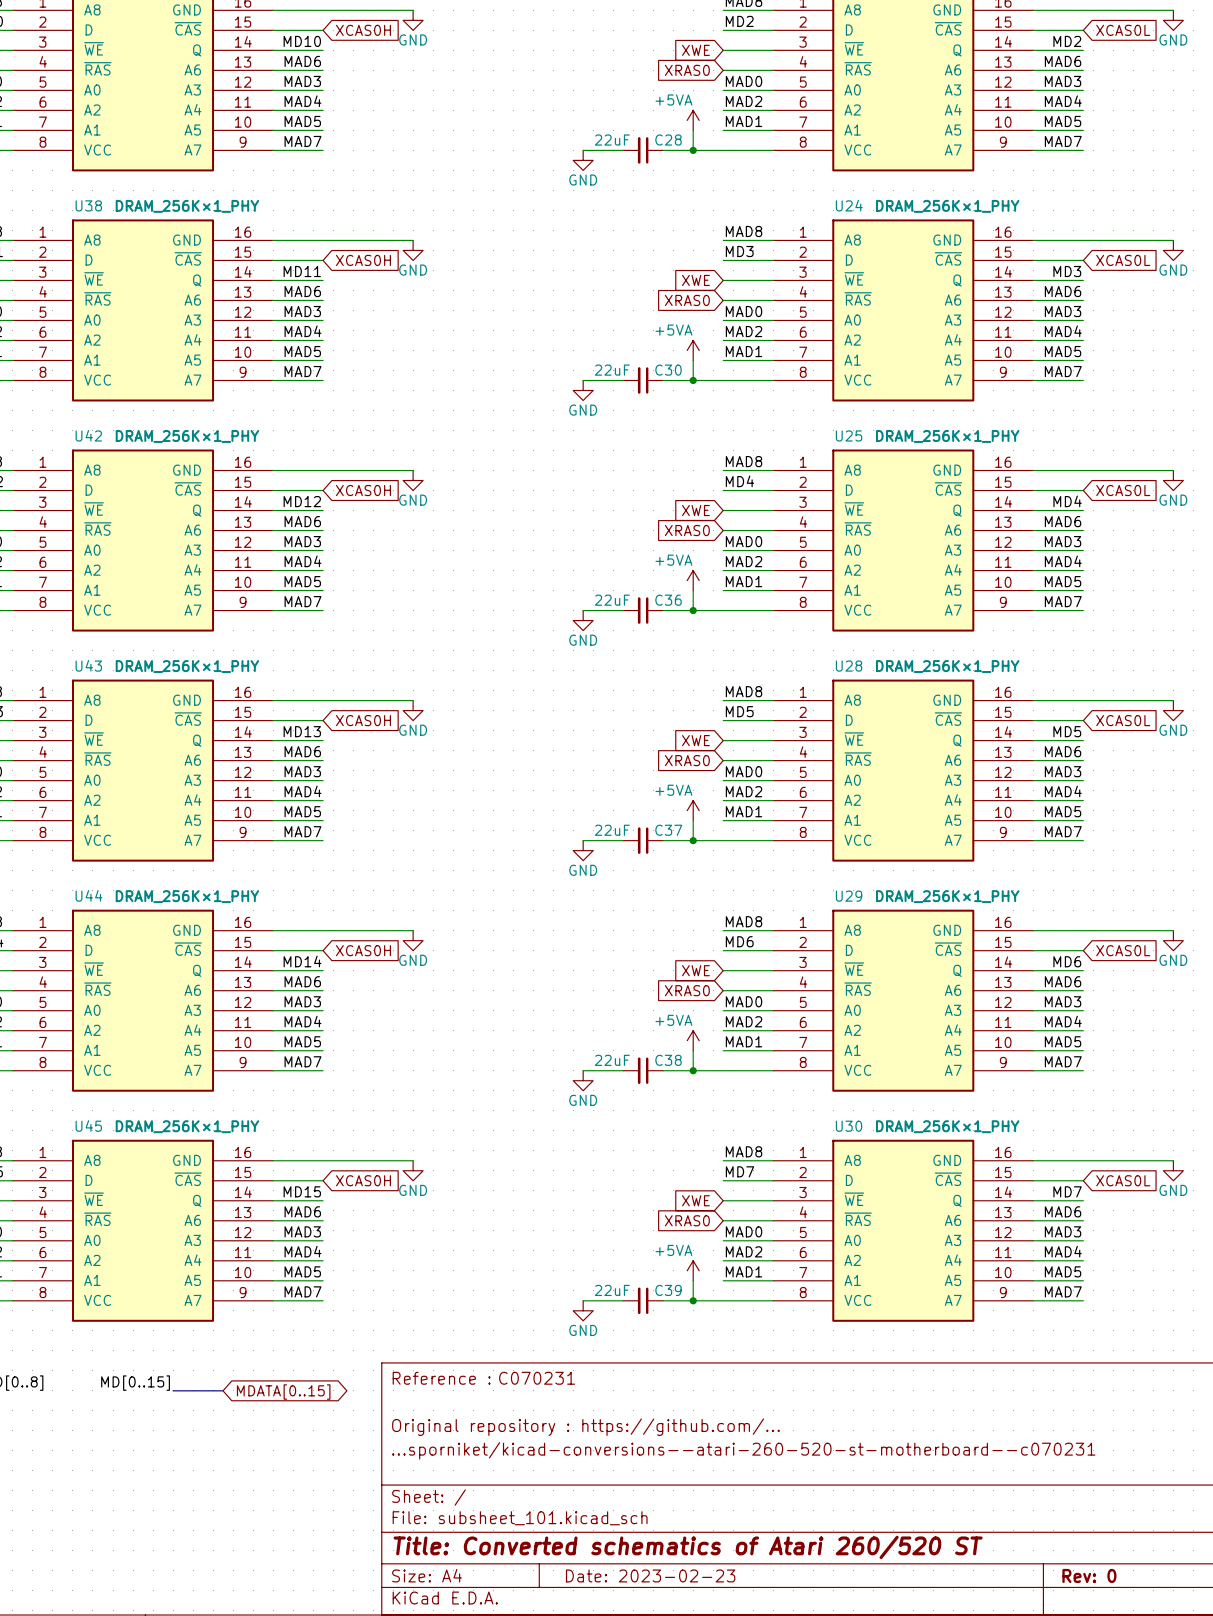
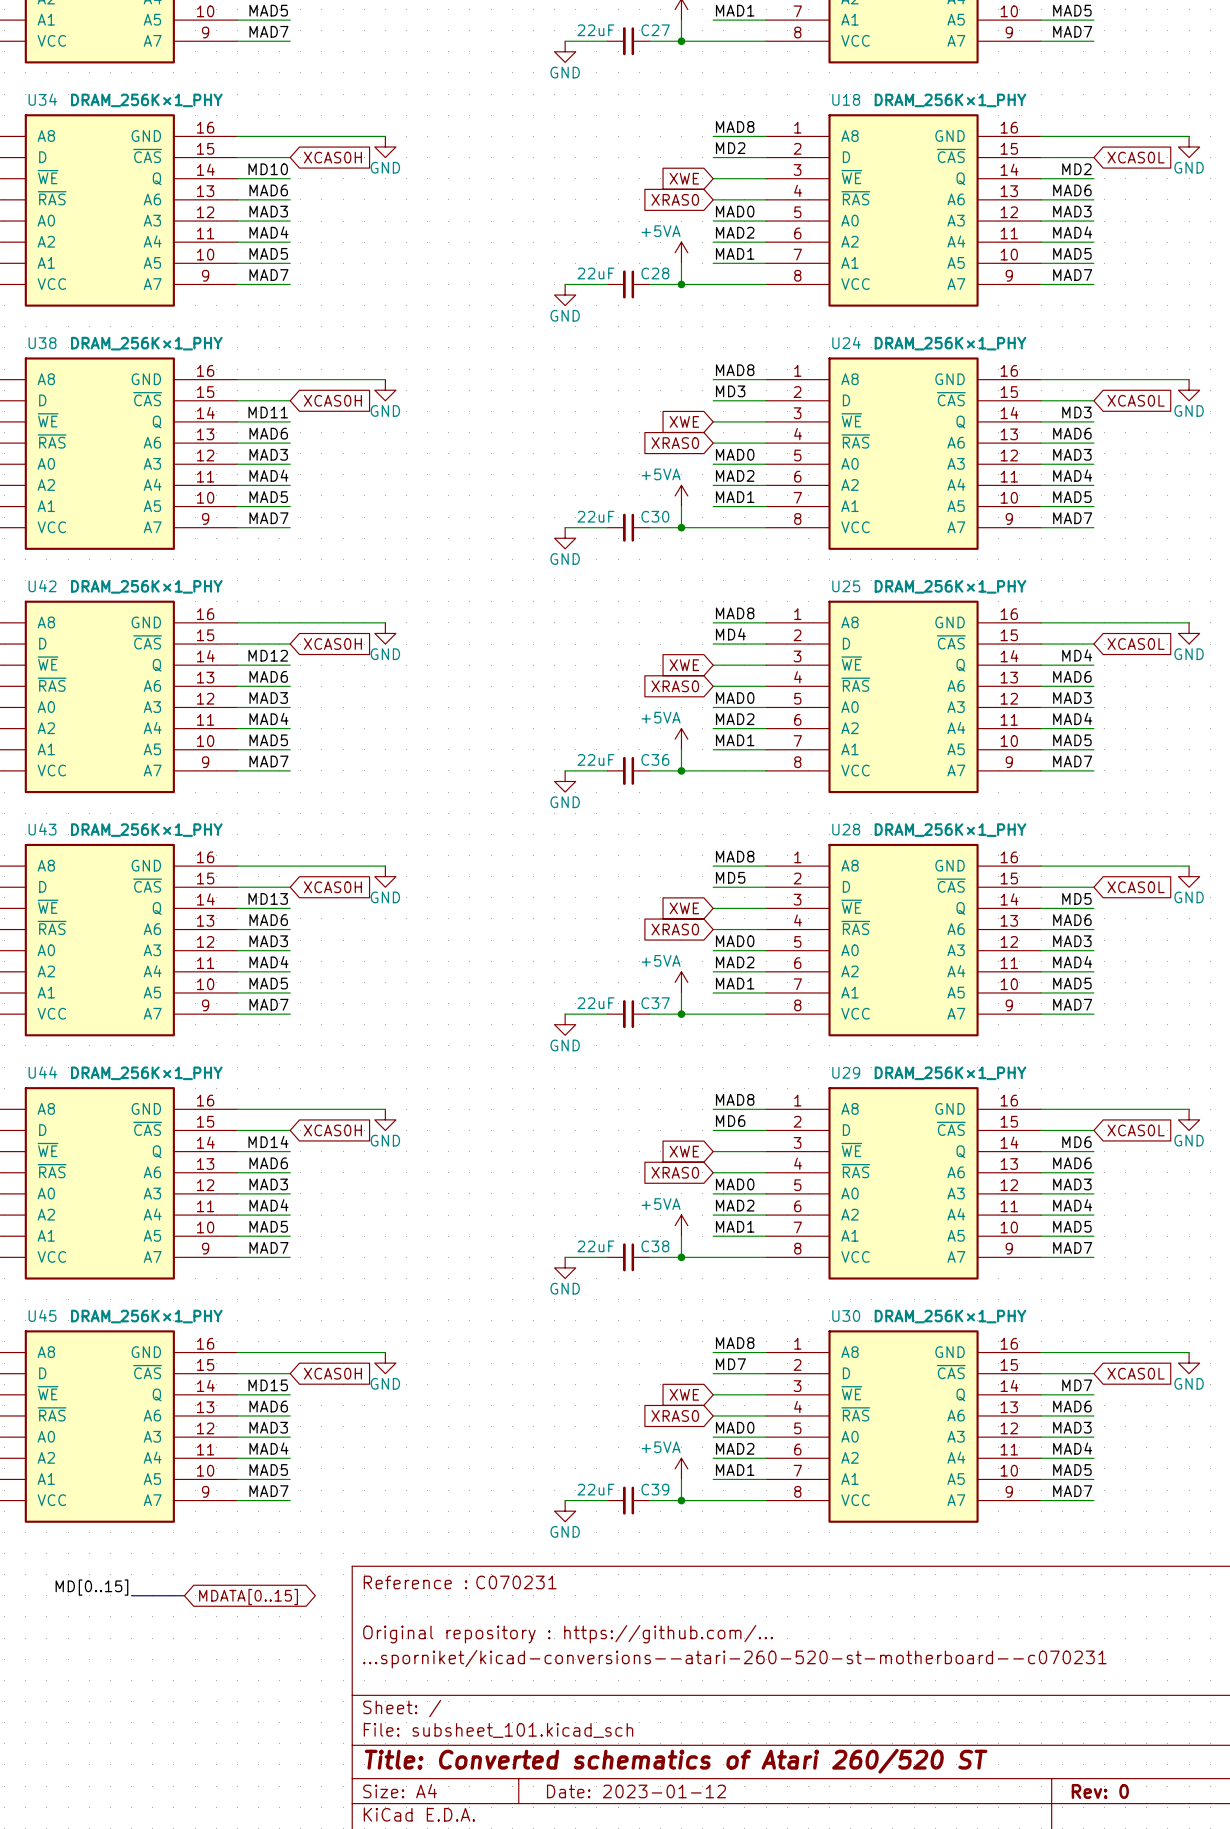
title block: Date: 2023-02-23 (650, 1575) -> Date: 2023-01-12 (636, 1791)

